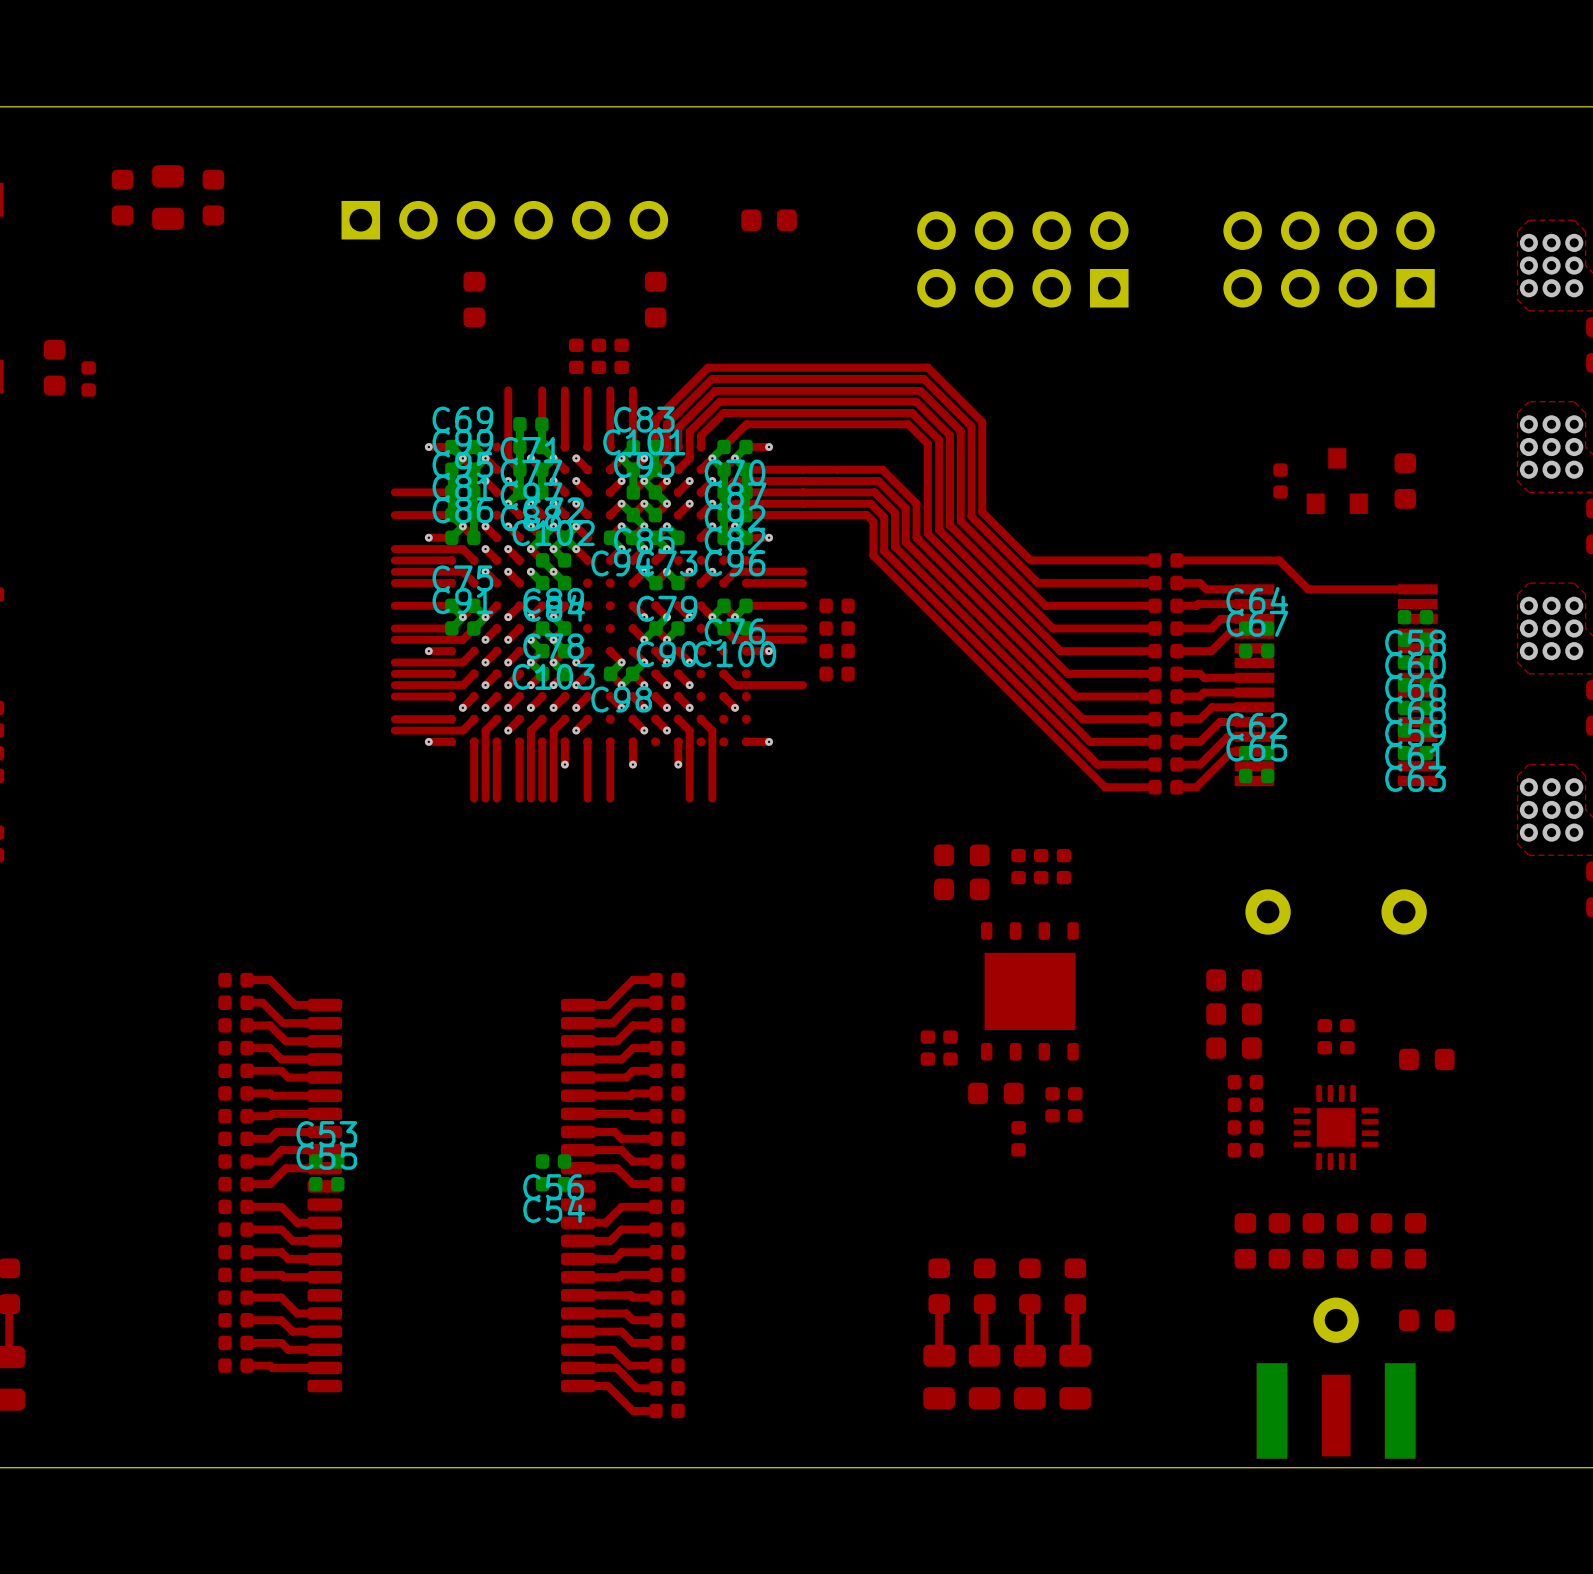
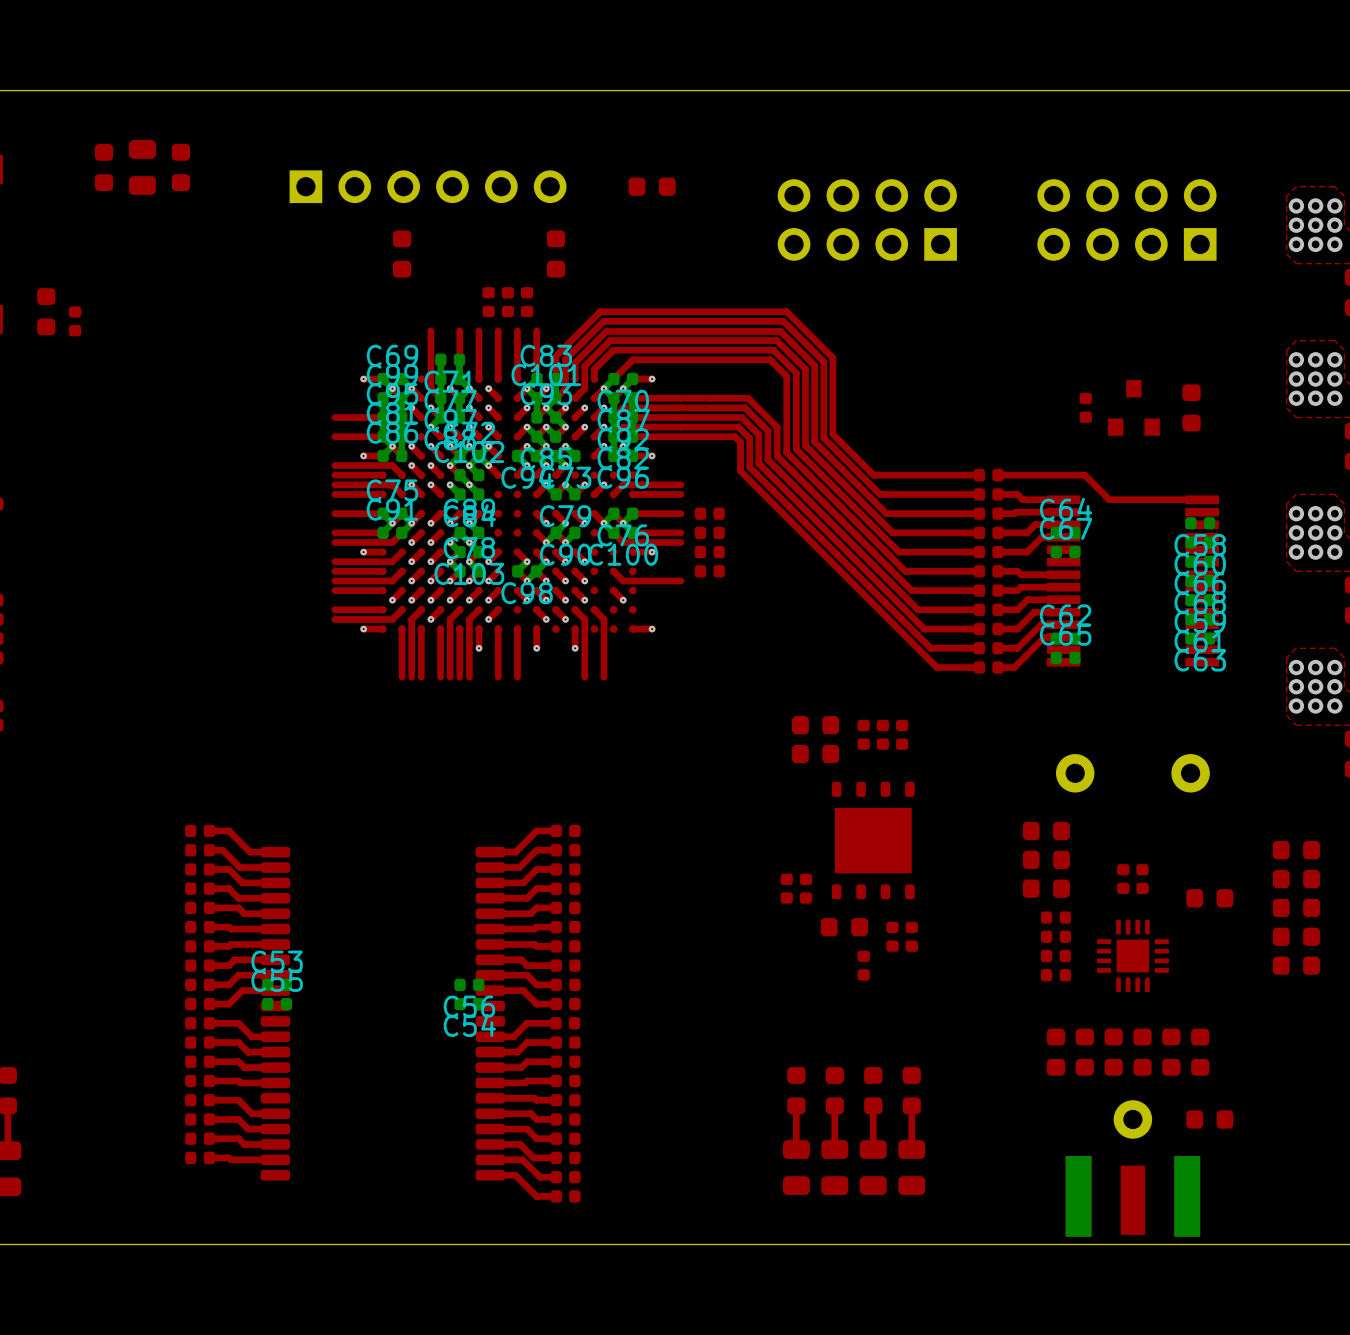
part: none -> (1296, 850)
part: none -> (1296, 879)
part: none -> (1296, 907)
part: none -> (1296, 936)
part: none -> (1296, 965)

